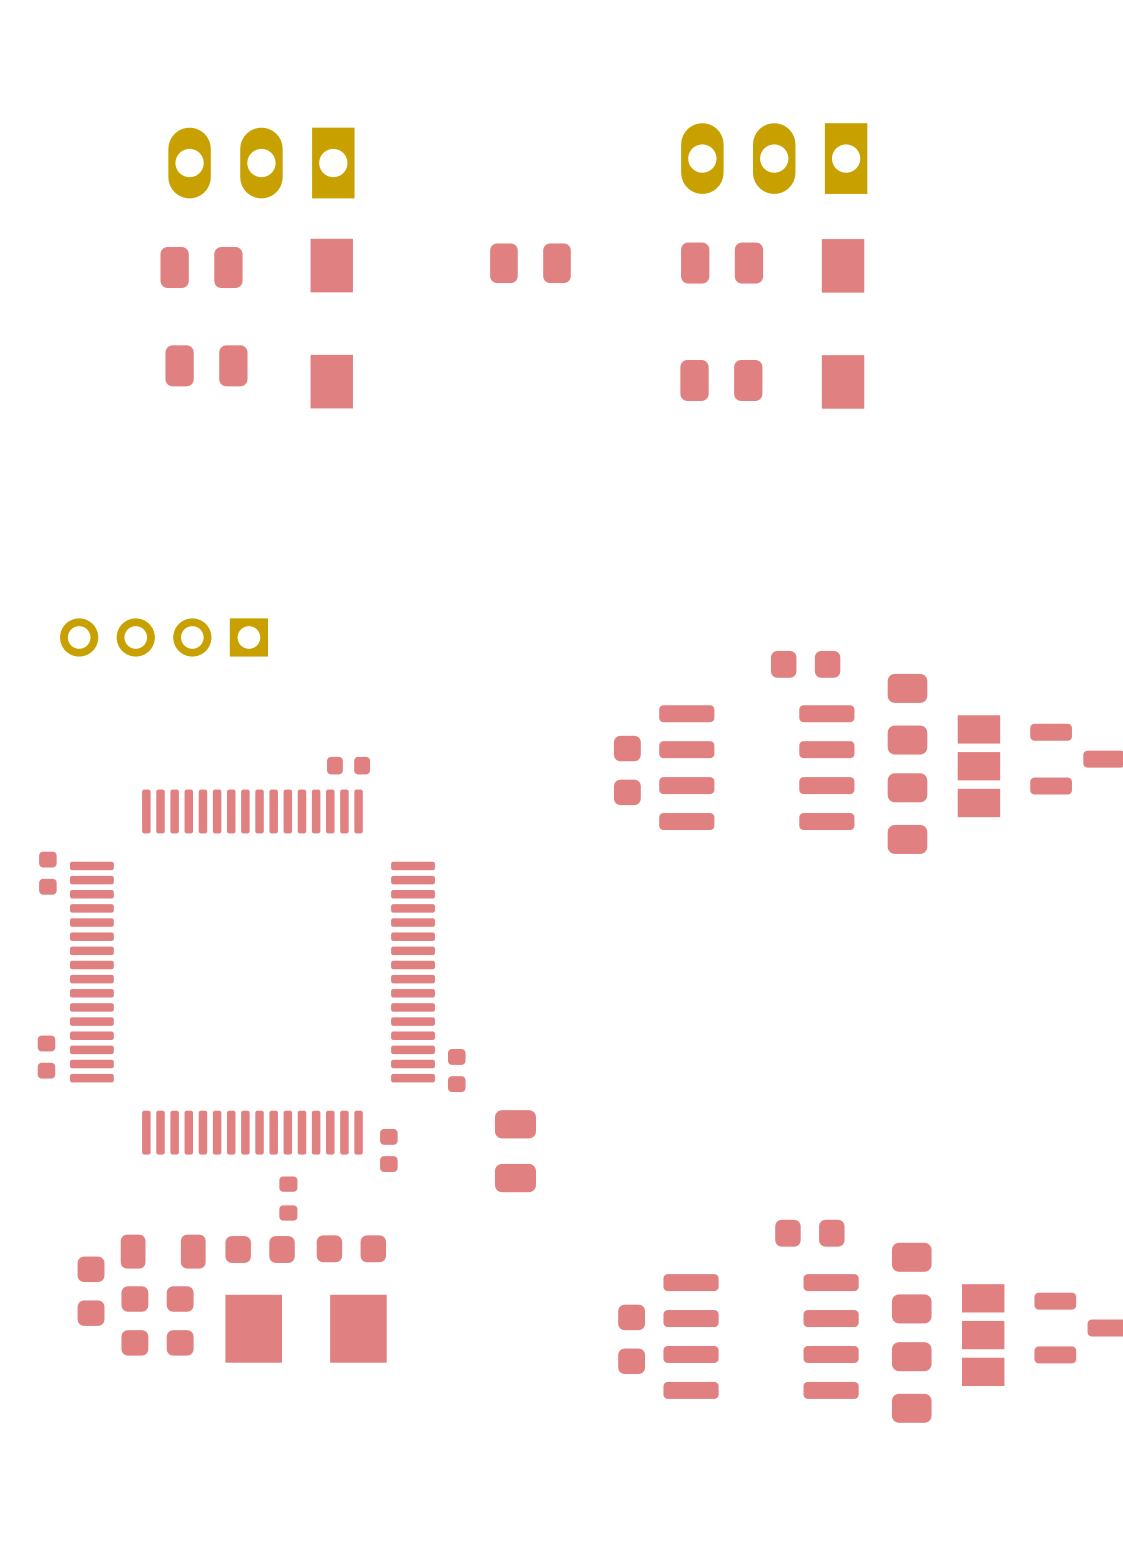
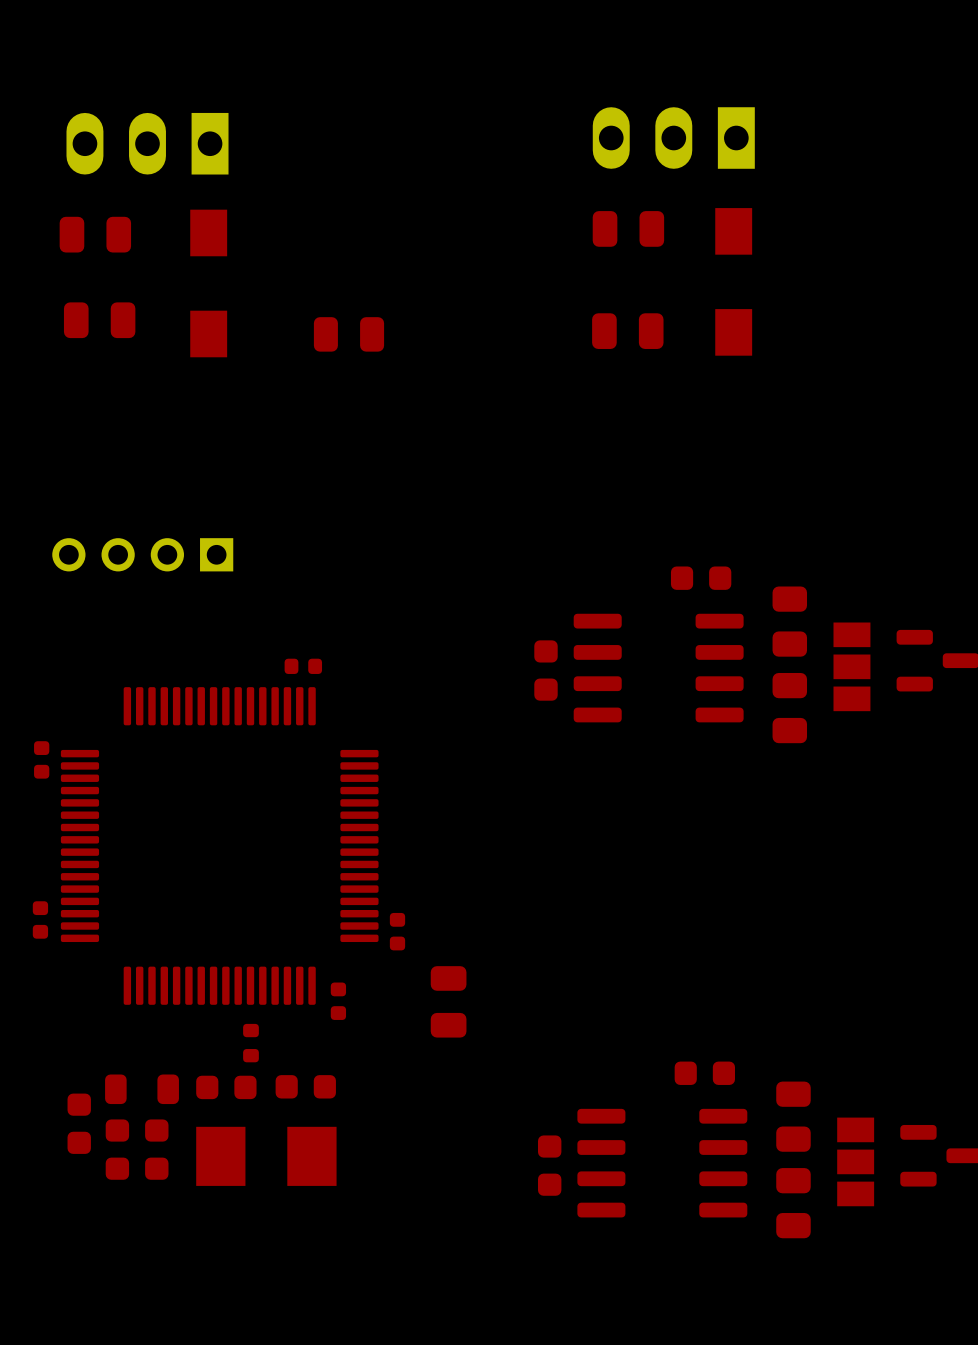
part position: (261, 163) -> (147, 143)
part position: (530, 263) -> (348, 334)
part: (201, 267) -> none
part: none -> (95, 234)
part position: (331, 323) -> (208, 283)
part: (206, 365) -> none
part: none -> (99, 320)

